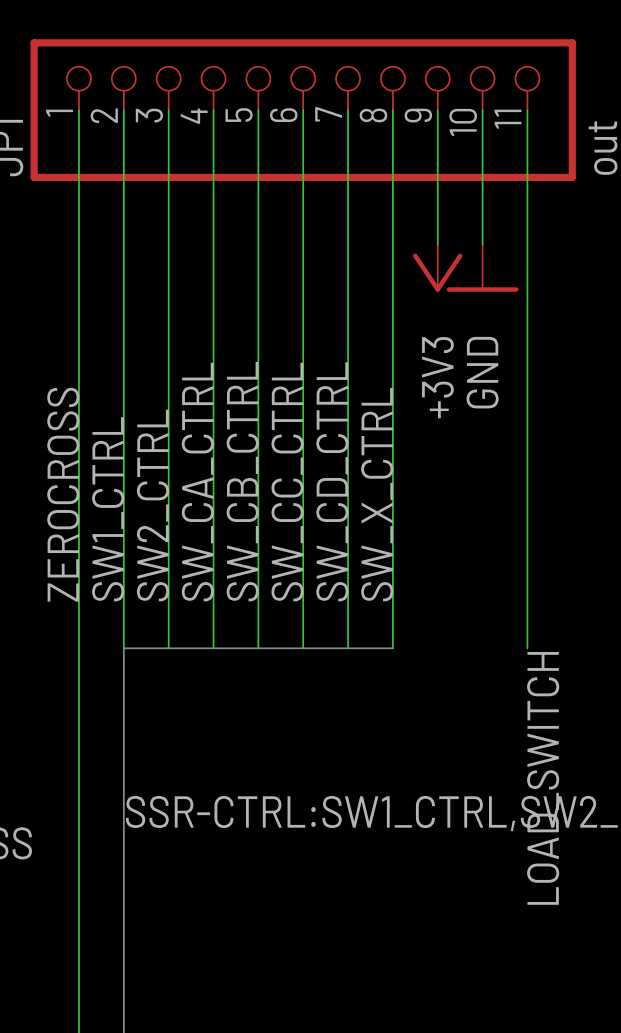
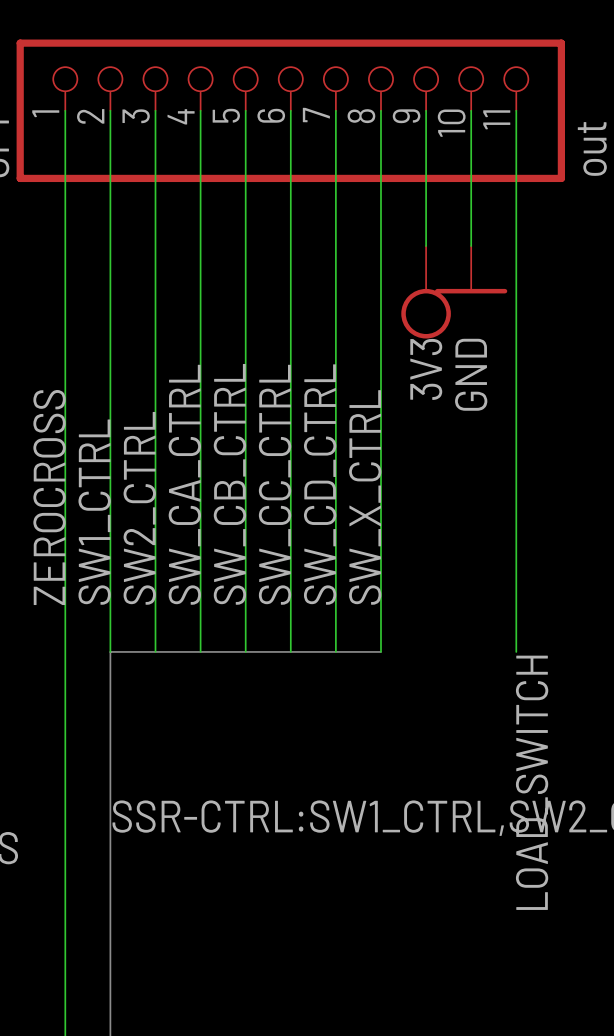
power symbol: +3V3 (437, 268) -> none
power symbol: none -> 3V3 (426, 292)

